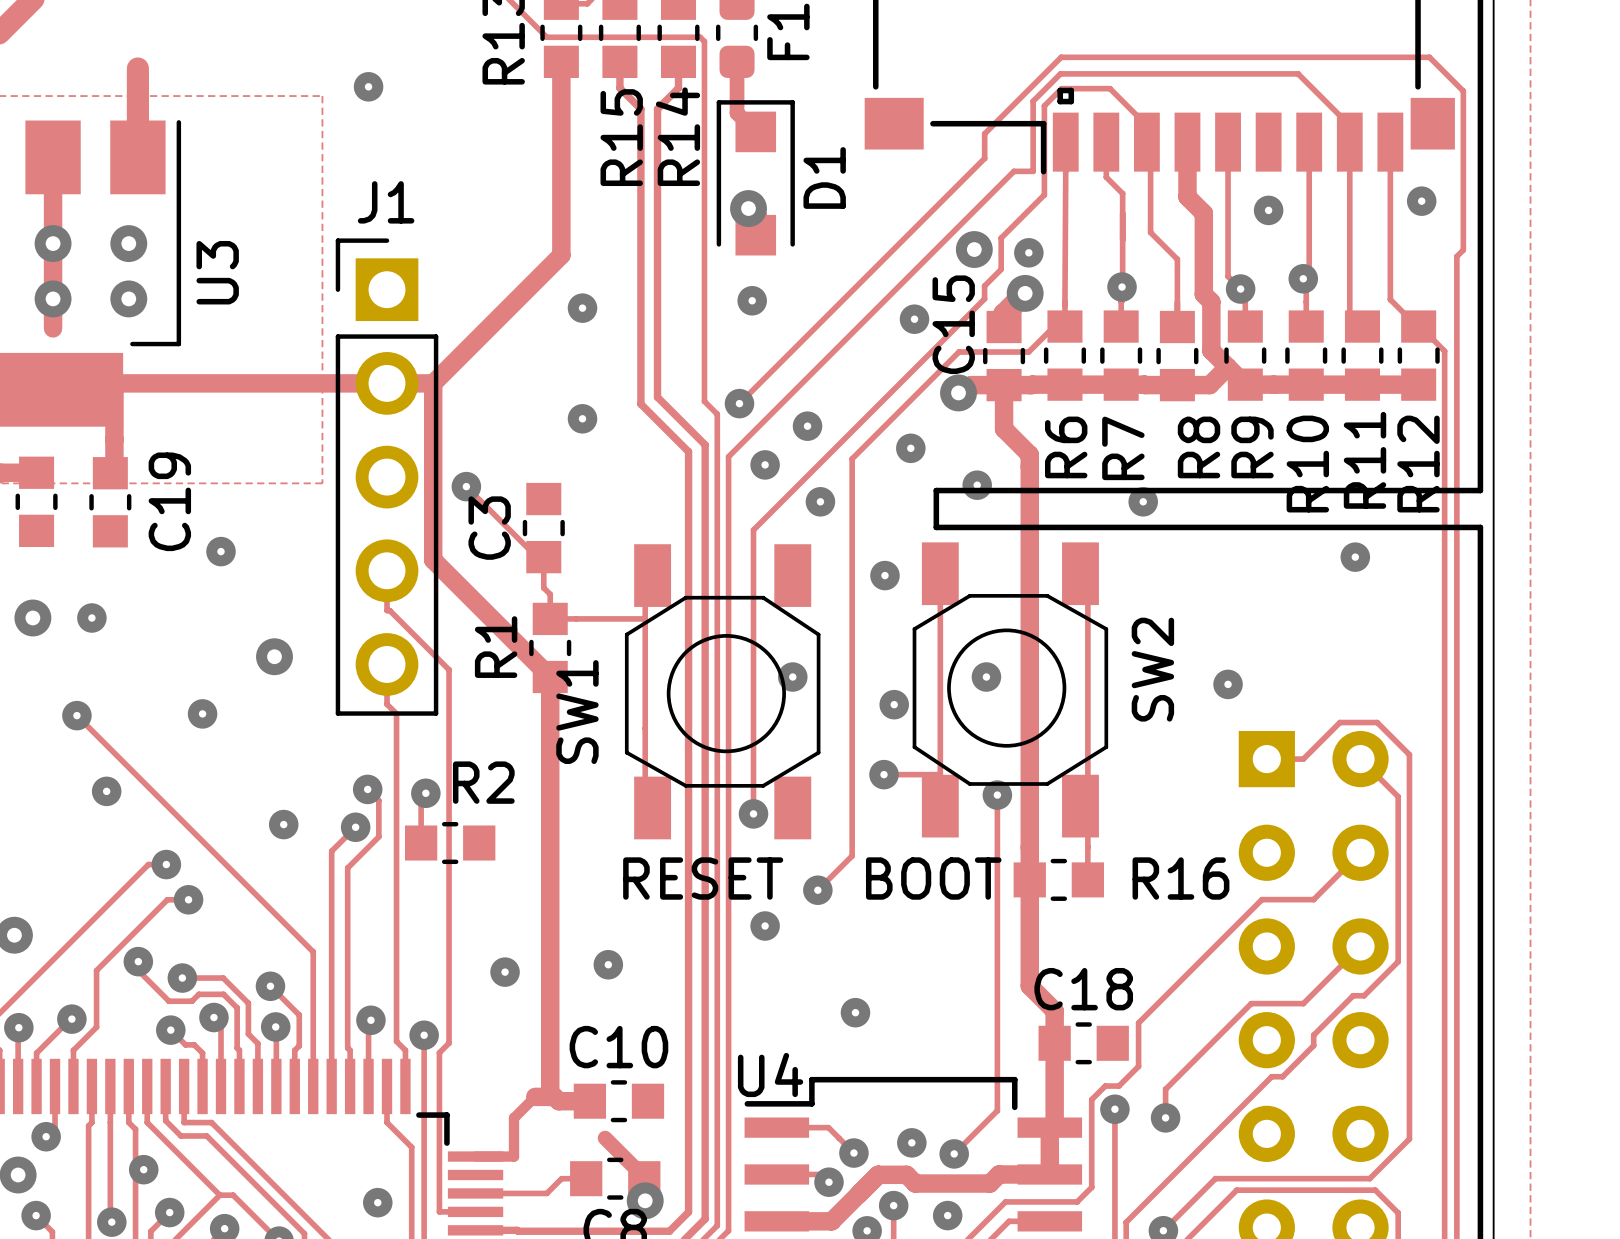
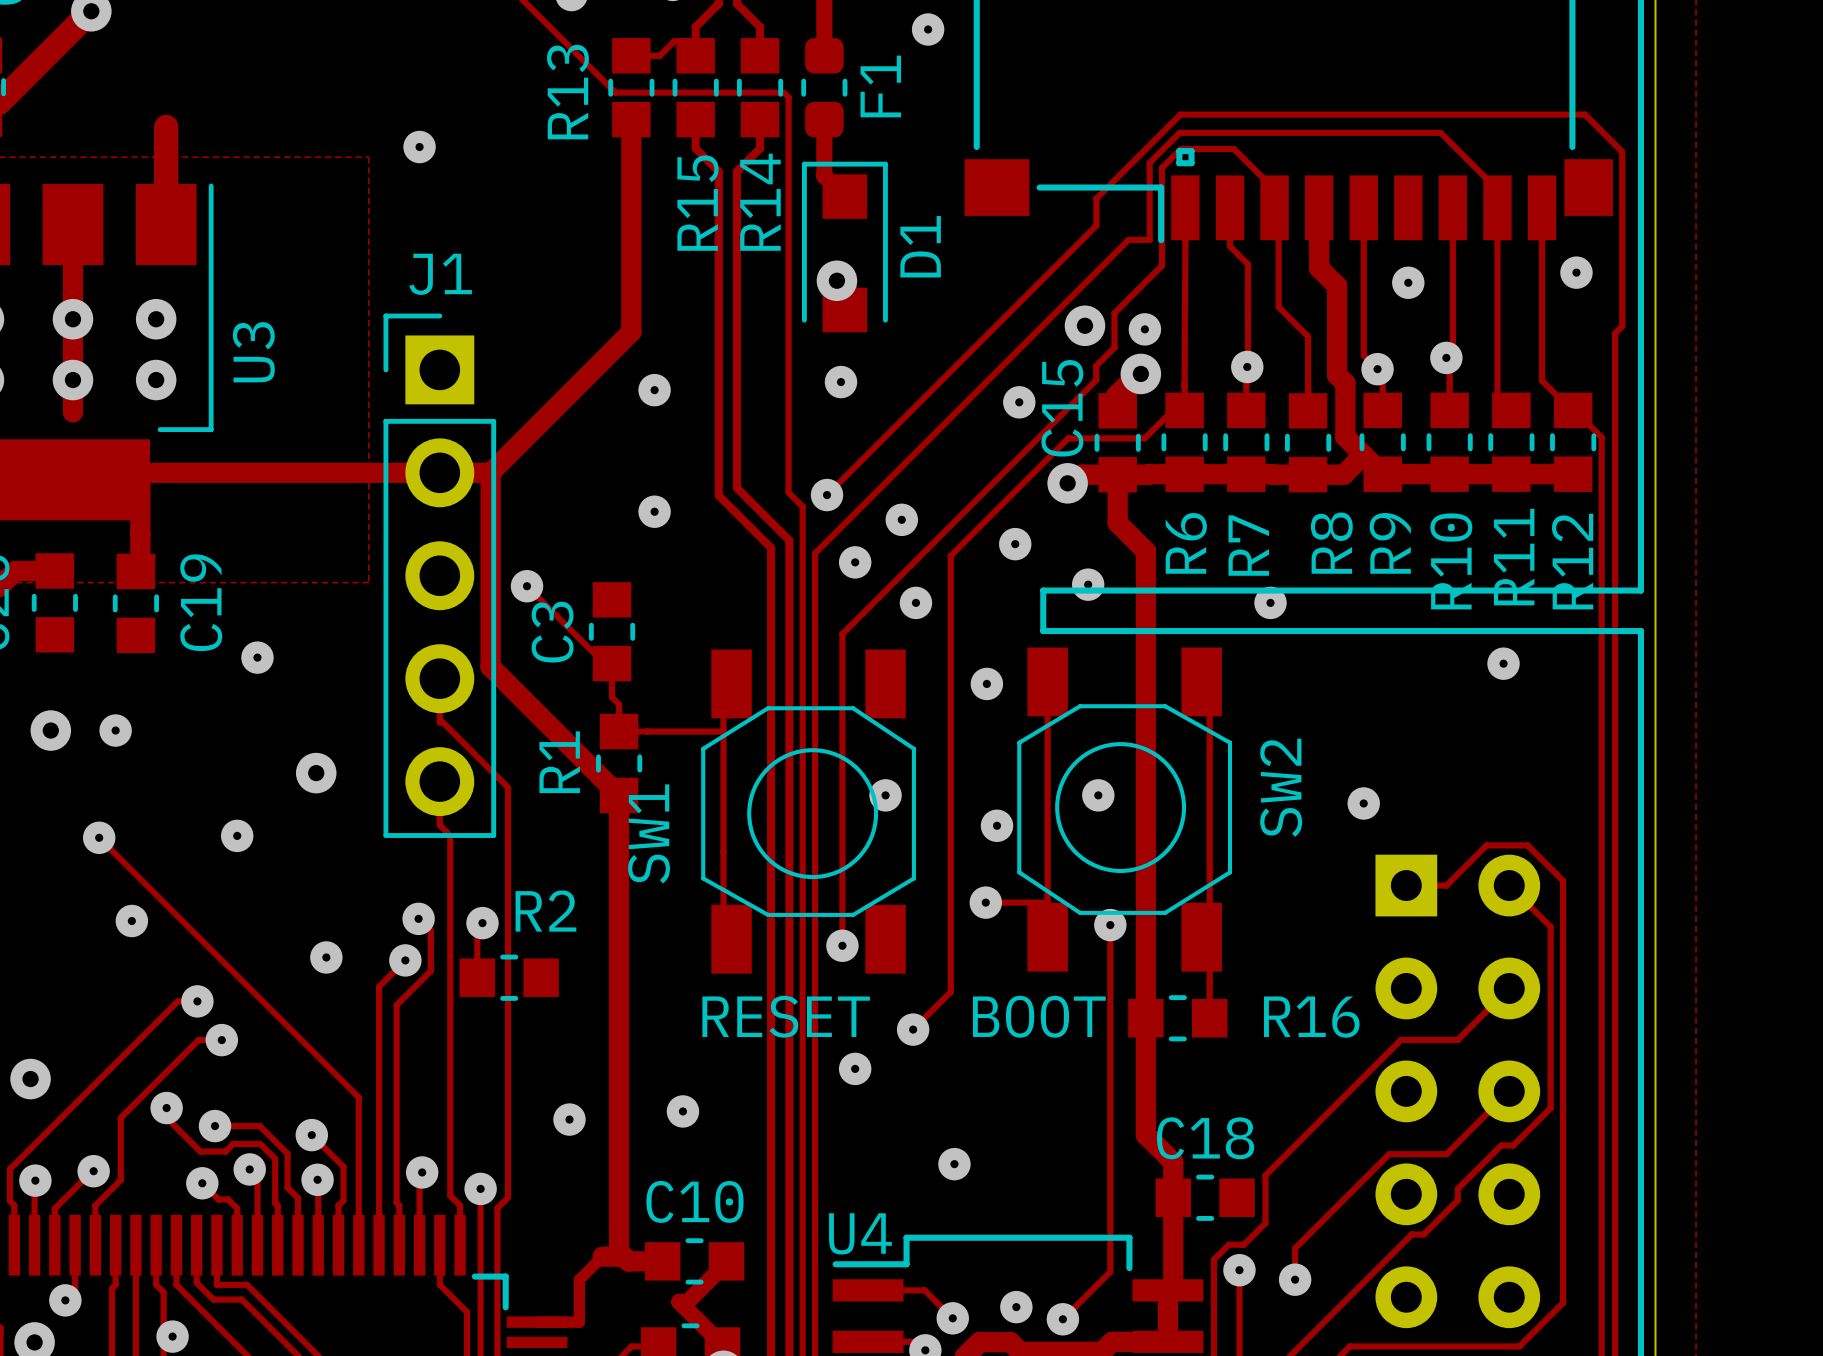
track: none -> (726, 1261) (687, 1301) (679, 1301)

